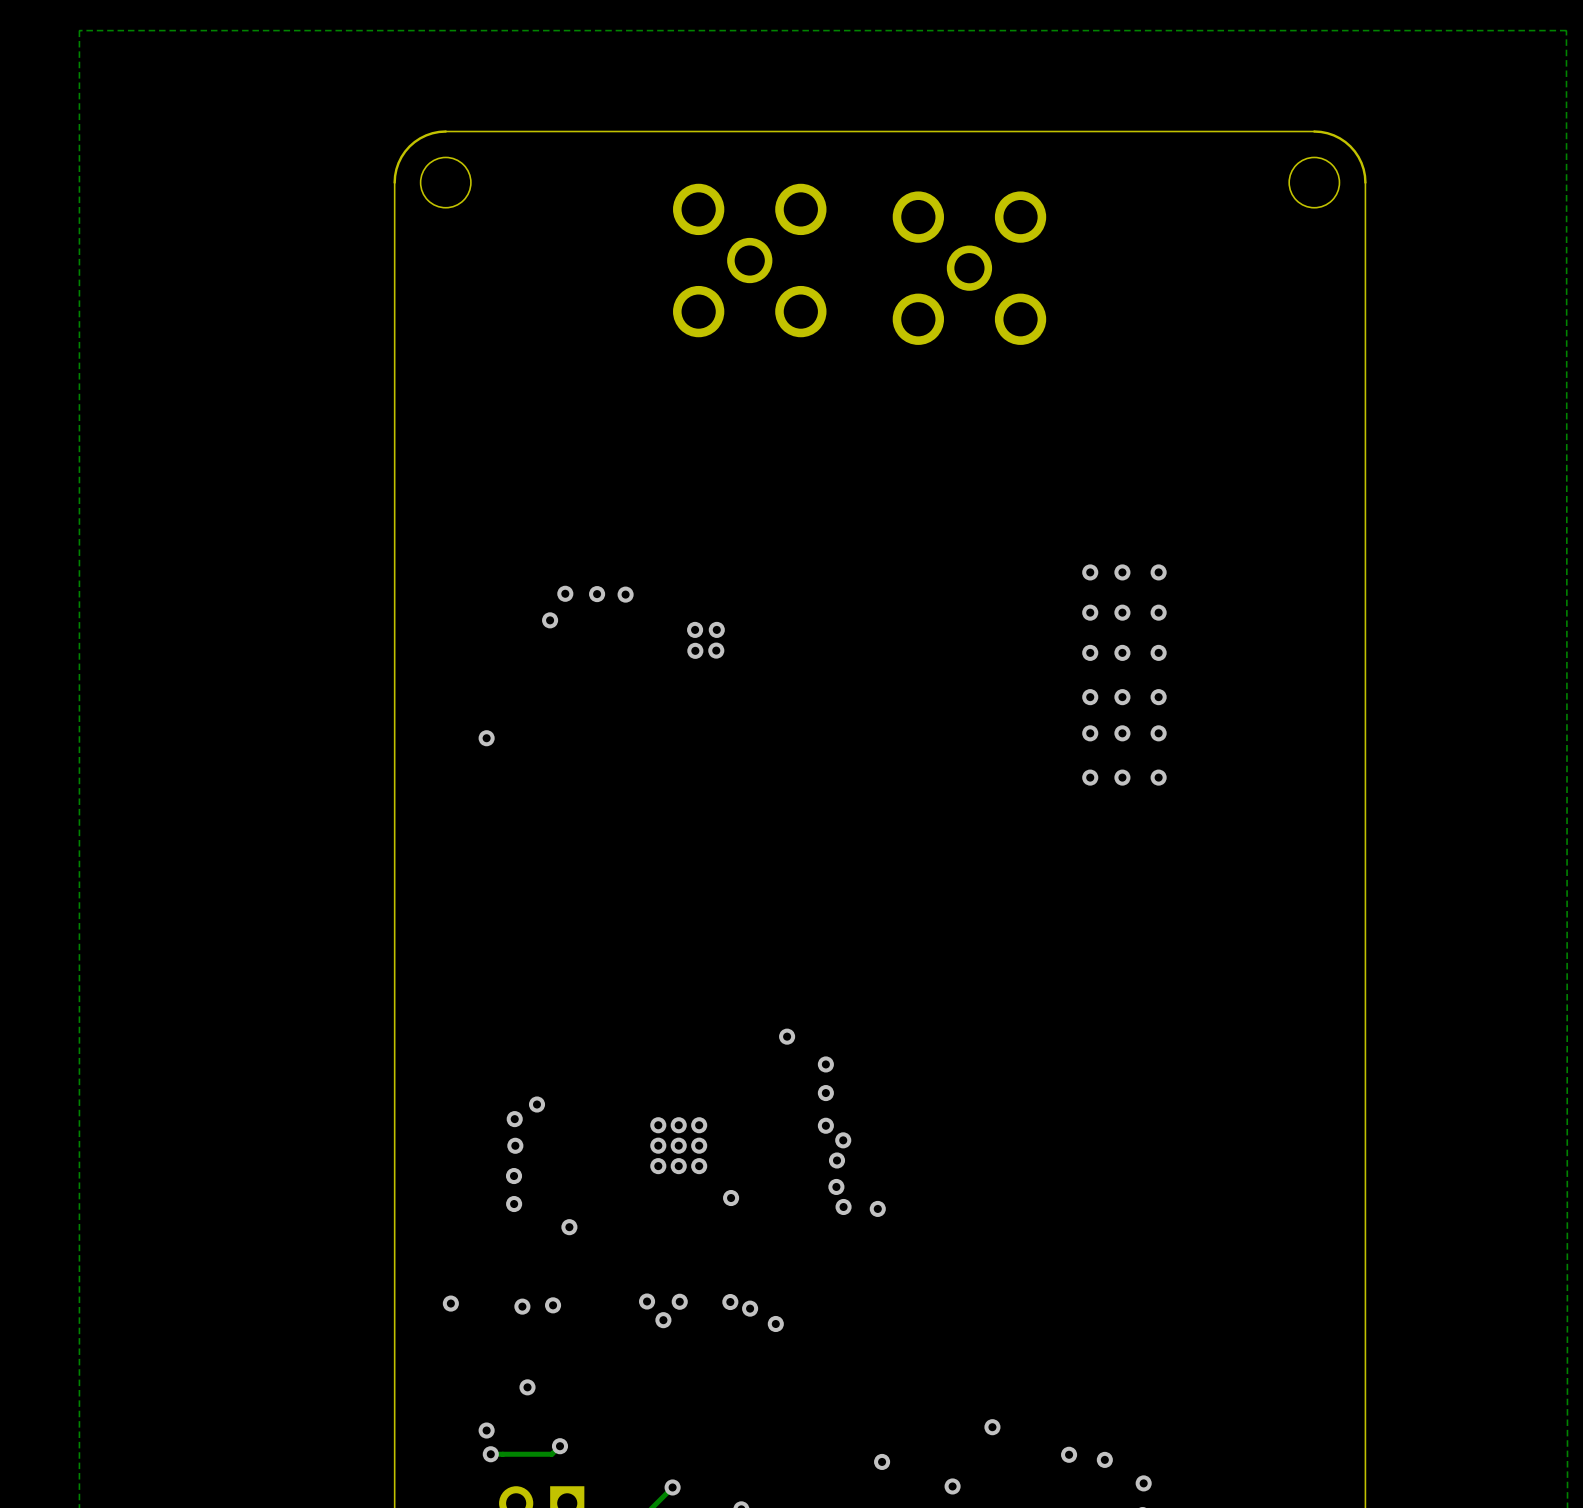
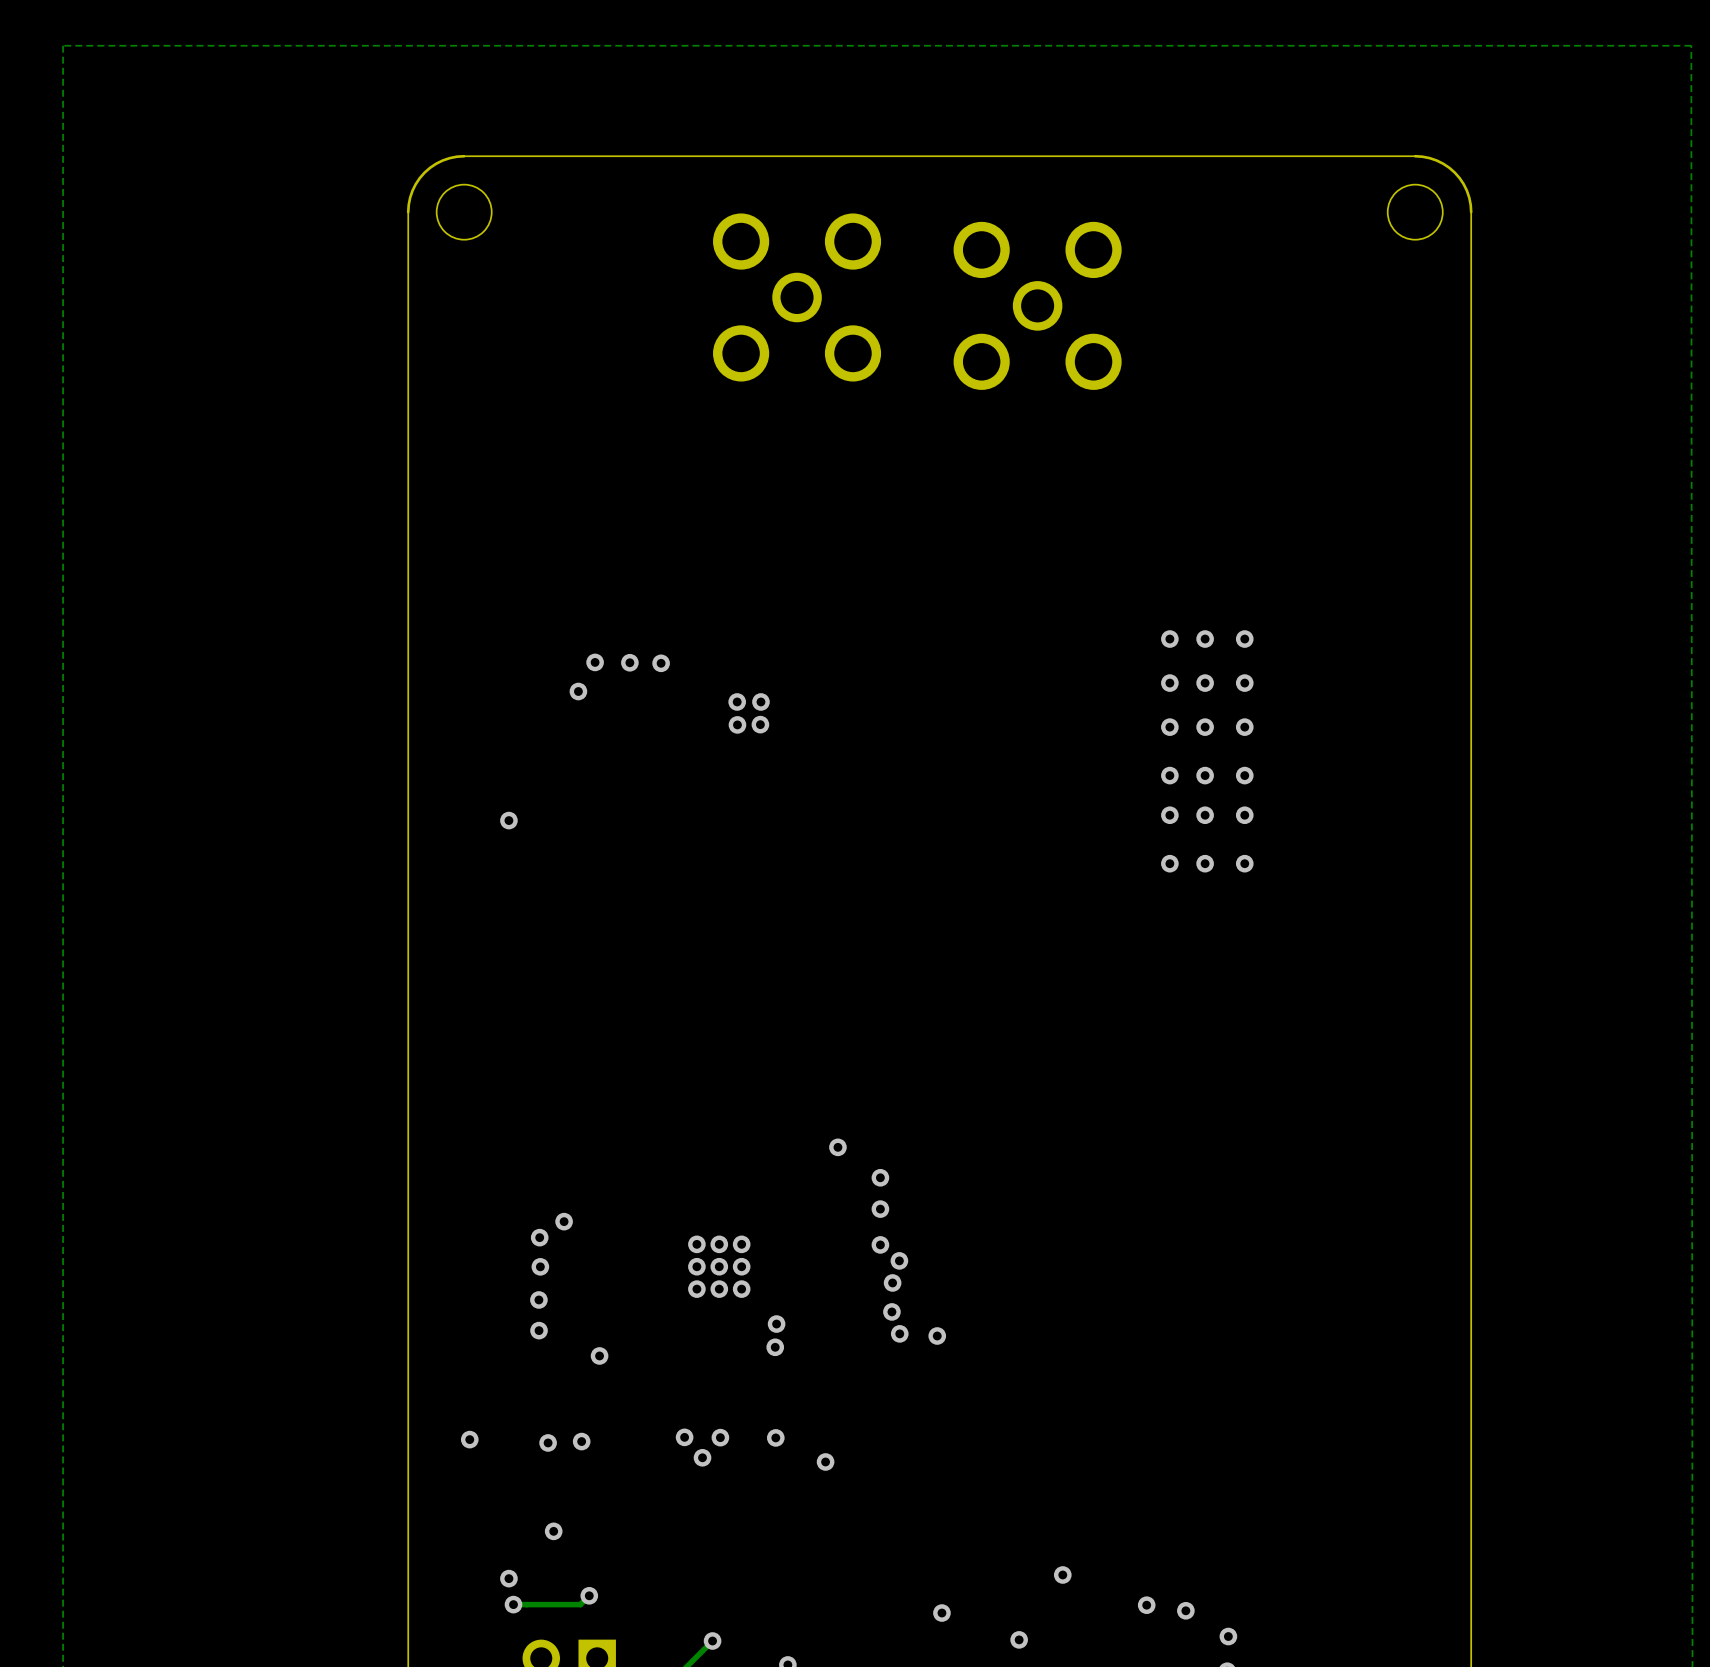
via position: (750, 1308) -> (775, 1347)

